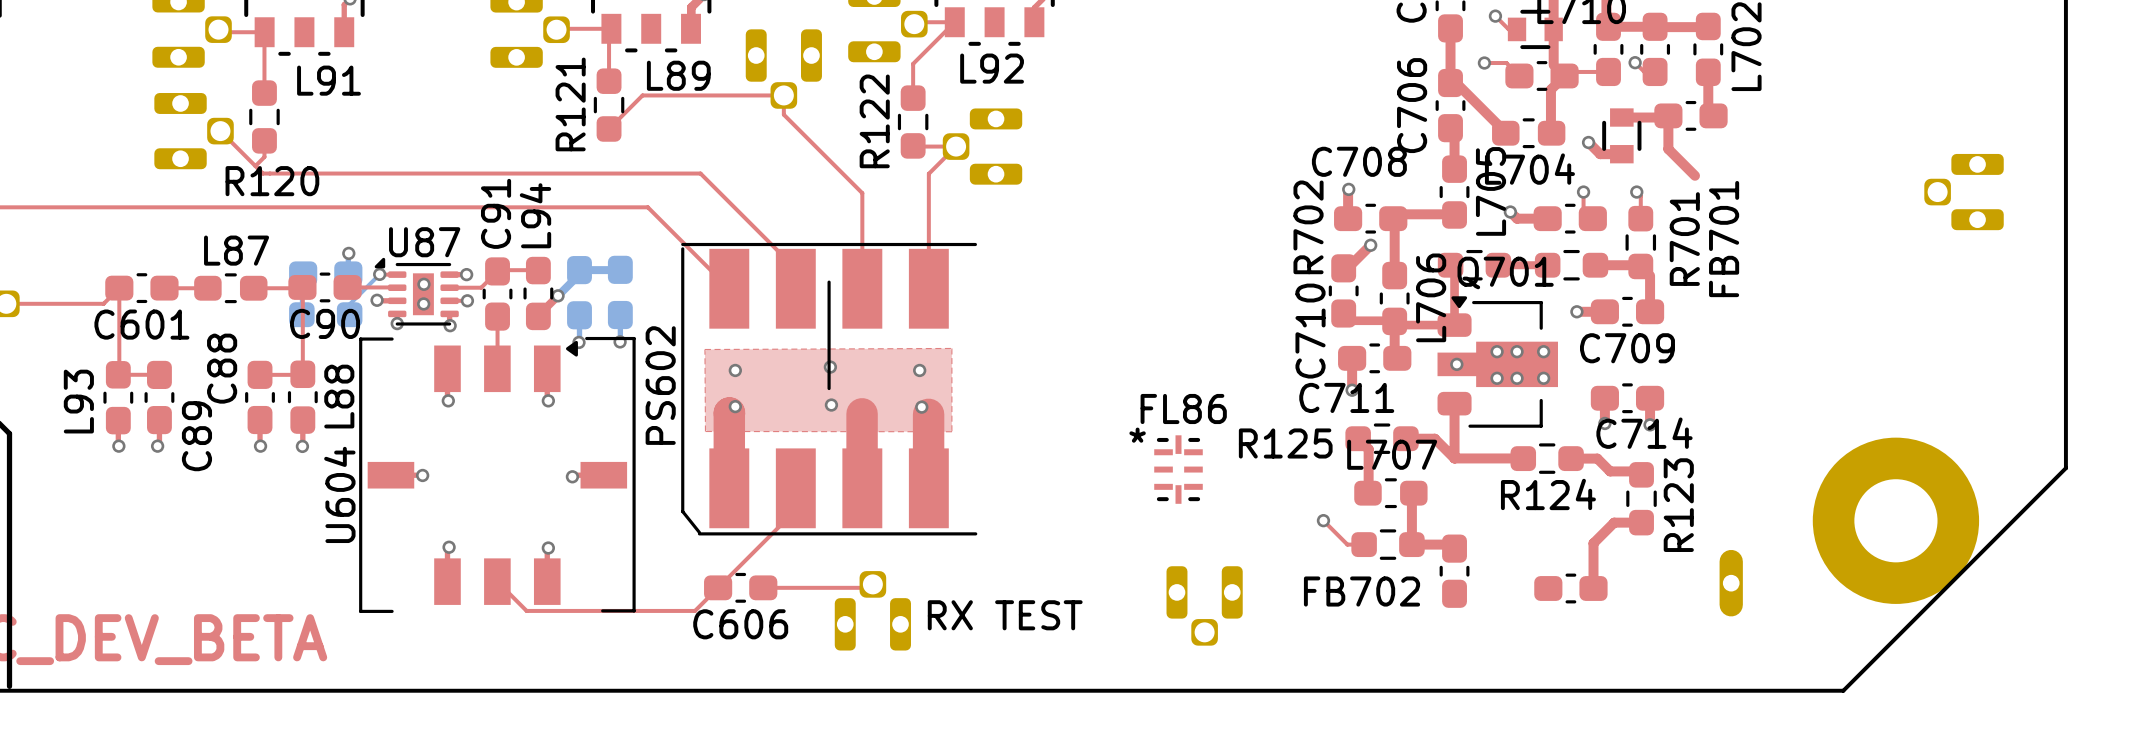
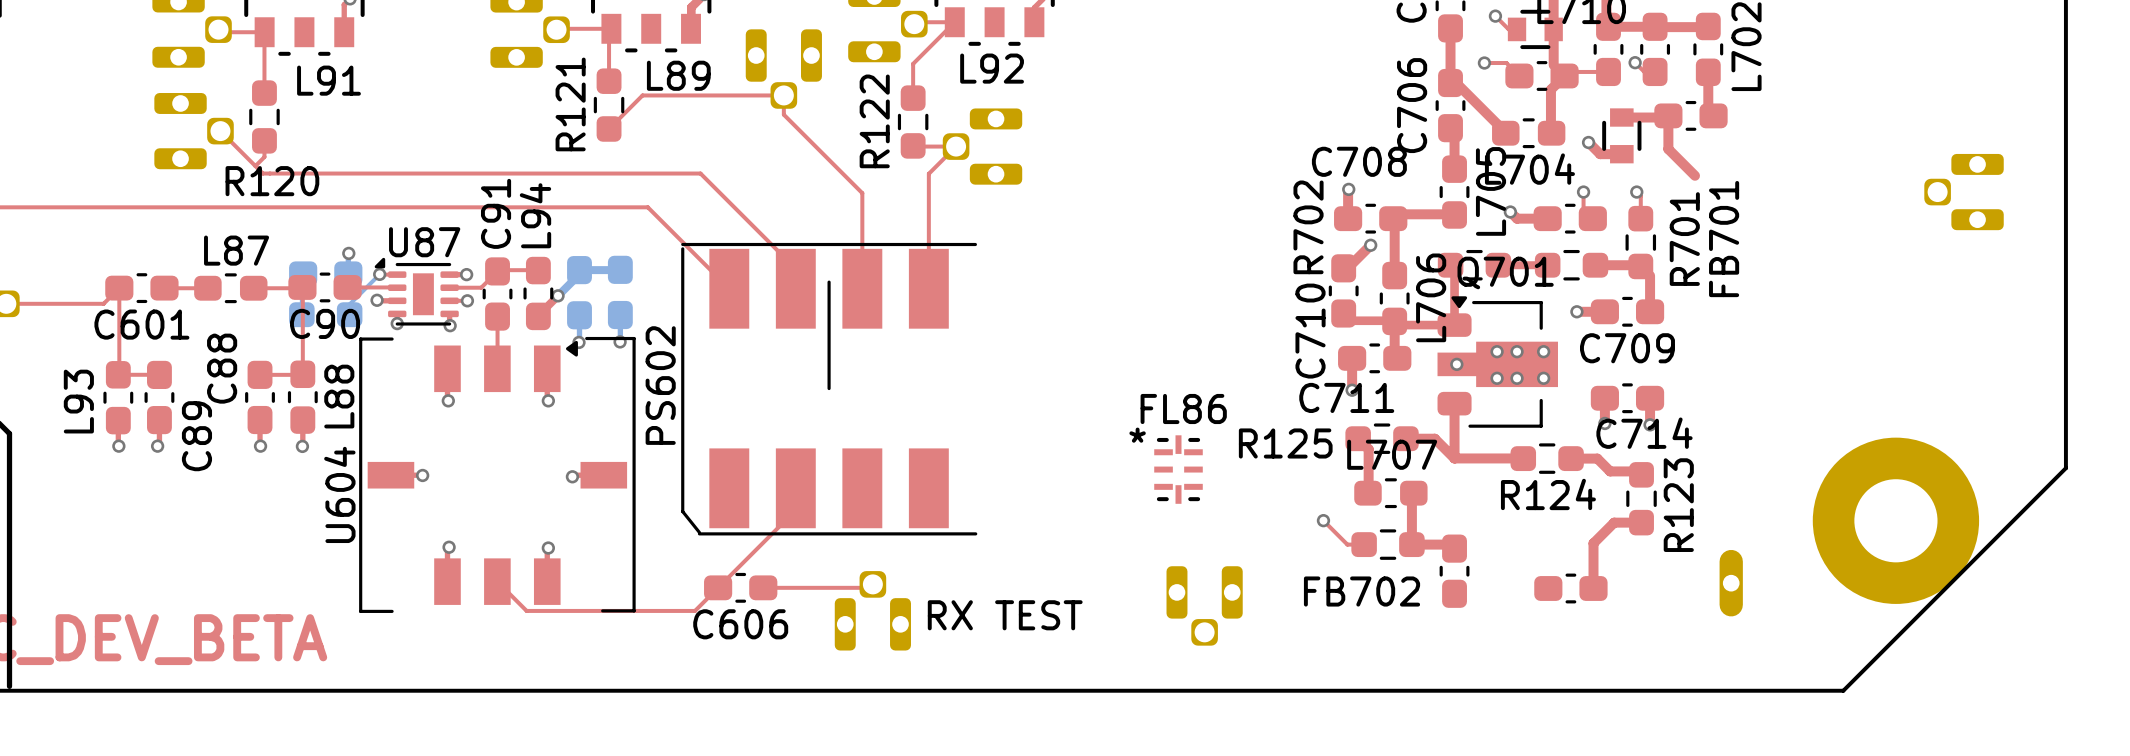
via: (423, 284) -> none
via: (423, 303) -> none
top zone outline: (951, 348) (704, 349) (705, 431) (951, 431) (951, 348) -> none
via: (830, 367) -> none
via: (735, 370) -> none
via: (919, 370) -> none
via: (831, 405) -> none
via: (735, 406) -> none
via: (921, 407) -> none
top track: (729, 413) (729, 488) -> none
top track: (862, 413) (862, 488) -> none
top track: (928, 414) (928, 489) -> none

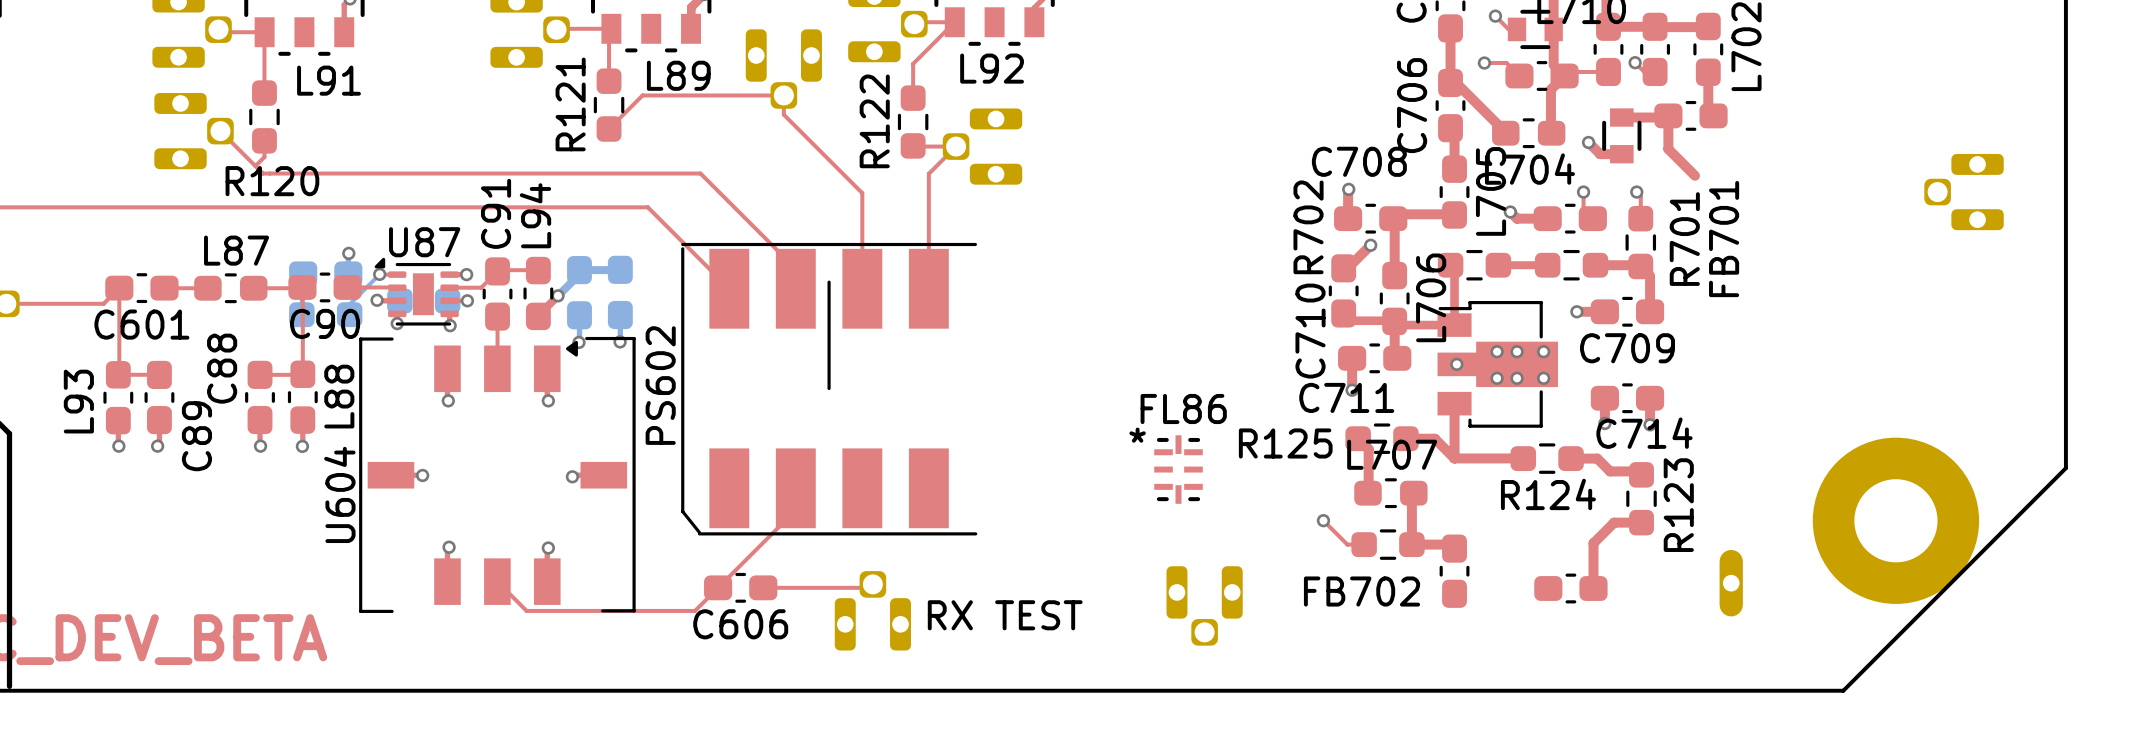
part: none -> (423, 301)
Q701: (1497, 362) -> none
part: none -> (1497, 364)

